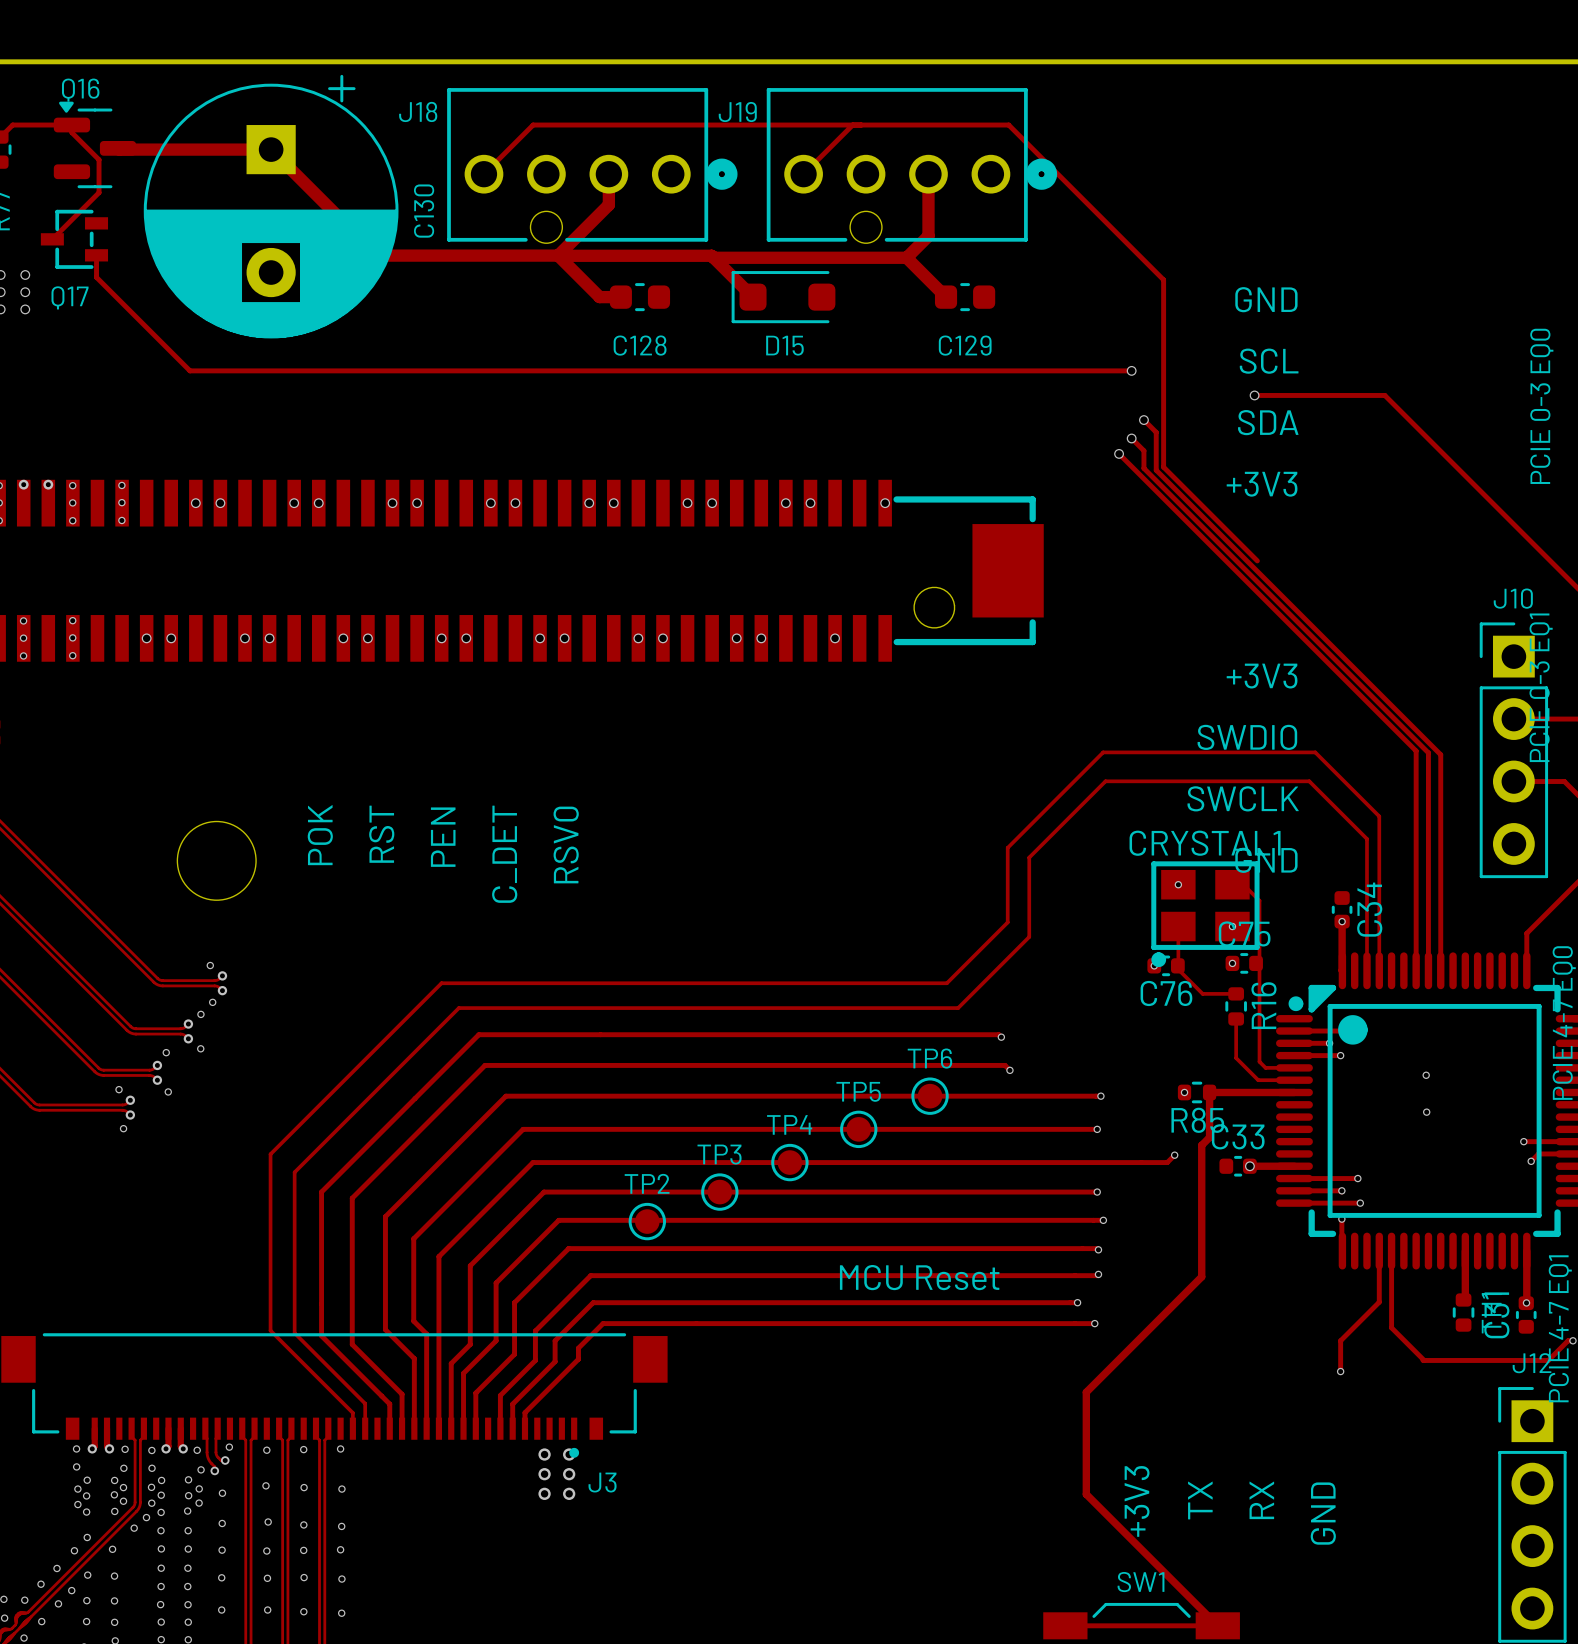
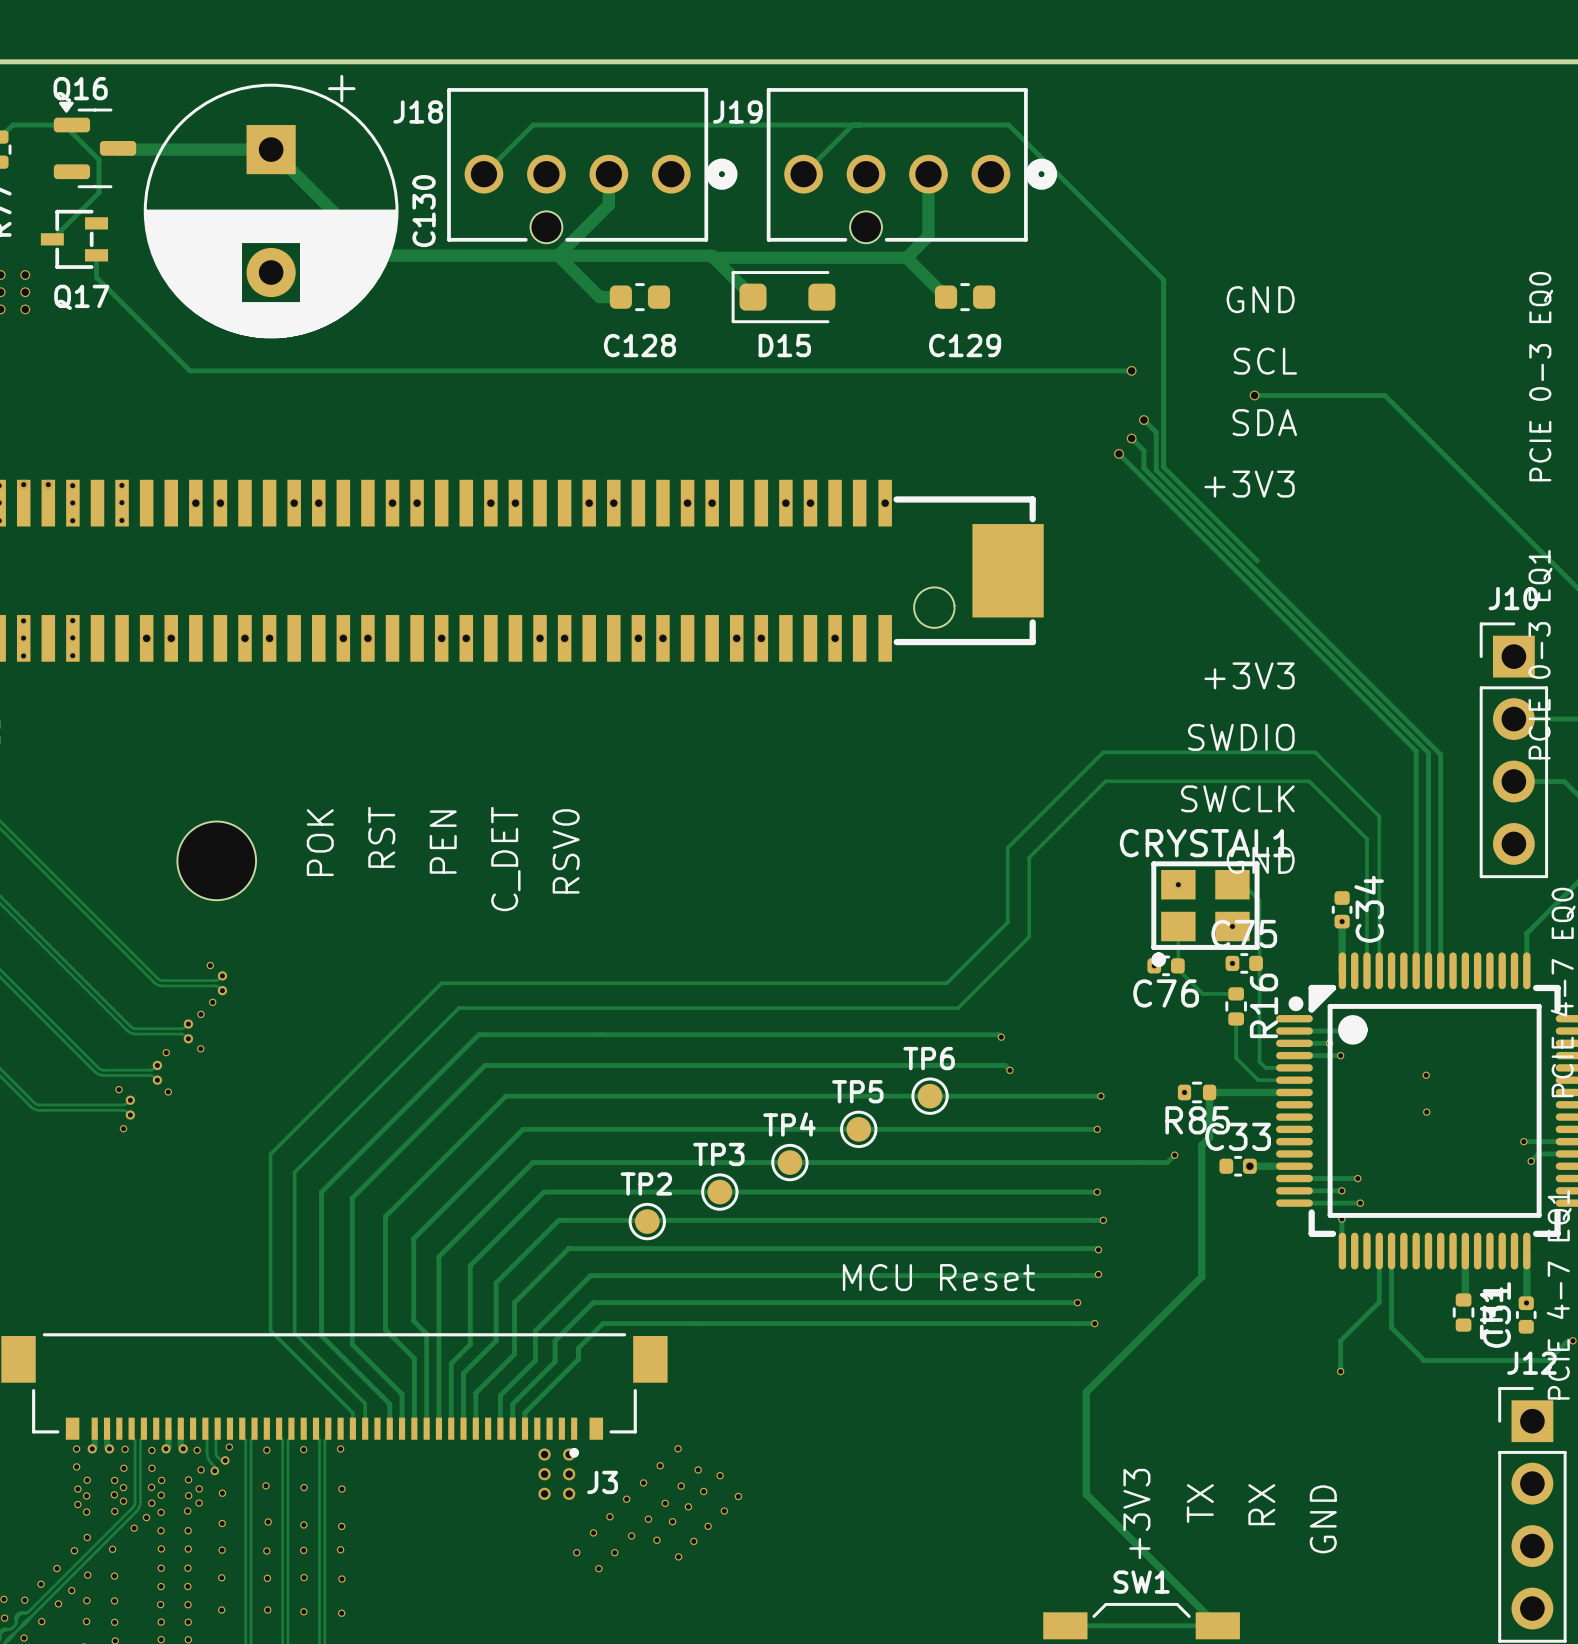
via: none -> (678, 1448)
via: none -> (660, 1465)
via: none -> (698, 1469)
via: none -> (720, 1475)
via: none -> (643, 1482)
via: none -> (681, 1486)
via: none -> (703, 1491)
via: none -> (738, 1496)
via: none -> (626, 1499)
via: none -> (665, 1503)
via: none -> (688, 1506)
via: none -> (724, 1511)
via: none -> (609, 1516)
via: none -> (648, 1519)
via: none -> (672, 1521)
via: none -> (708, 1526)
via: none -> (593, 1532)
via: none -> (631, 1535)
via: none -> (656, 1540)
via: none -> (693, 1541)
via: none -> (576, 1552)
via: none -> (614, 1552)
via: none -> (678, 1556)
via: none -> (598, 1568)

